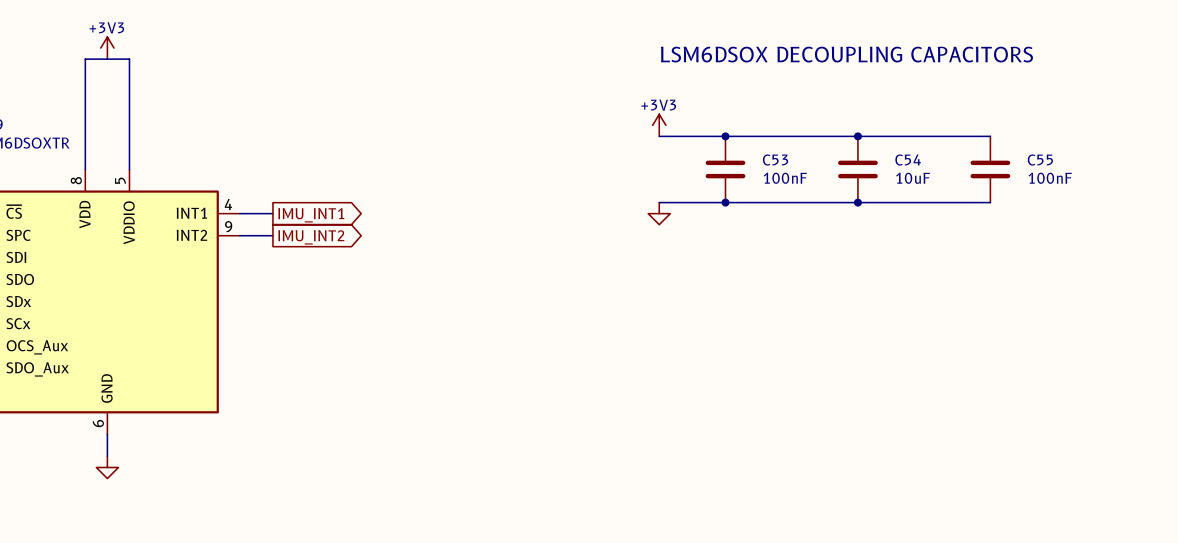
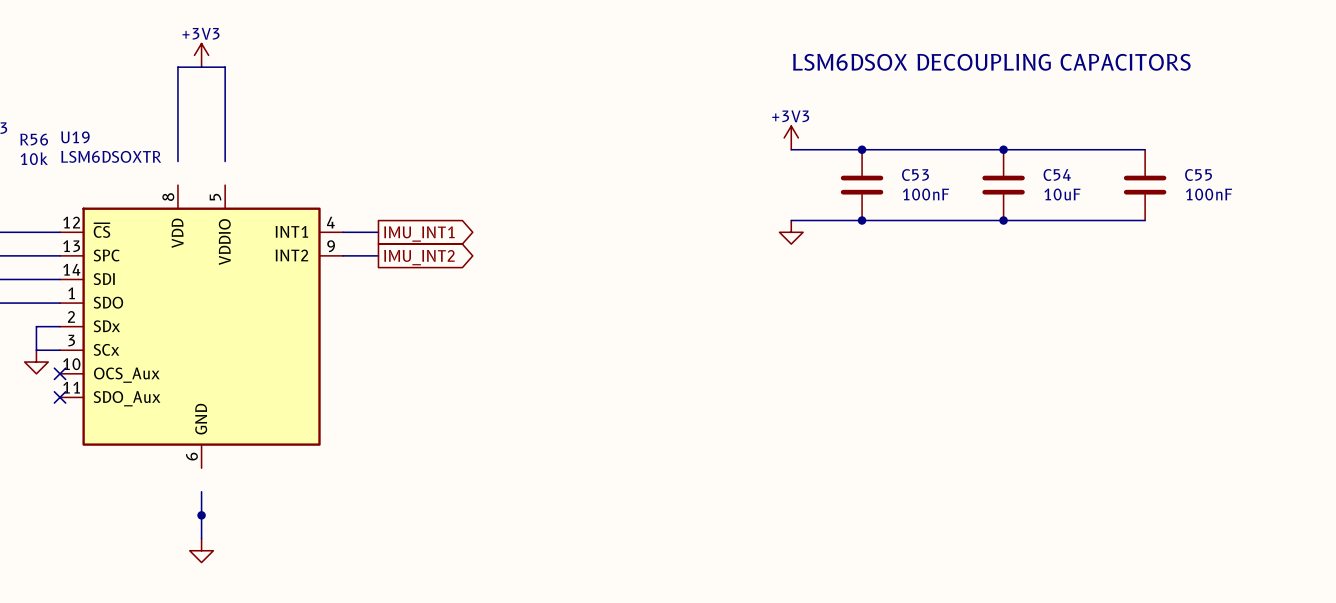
wire: (85, 147) (85, 169) -> none
wire: (129, 147) (129, 169) -> none
wire: (107, 434) (107, 456) -> (201, 538) (201, 491)
power symbol position: (107, 467) -> (201, 550)
junction: none -> (201, 515)

